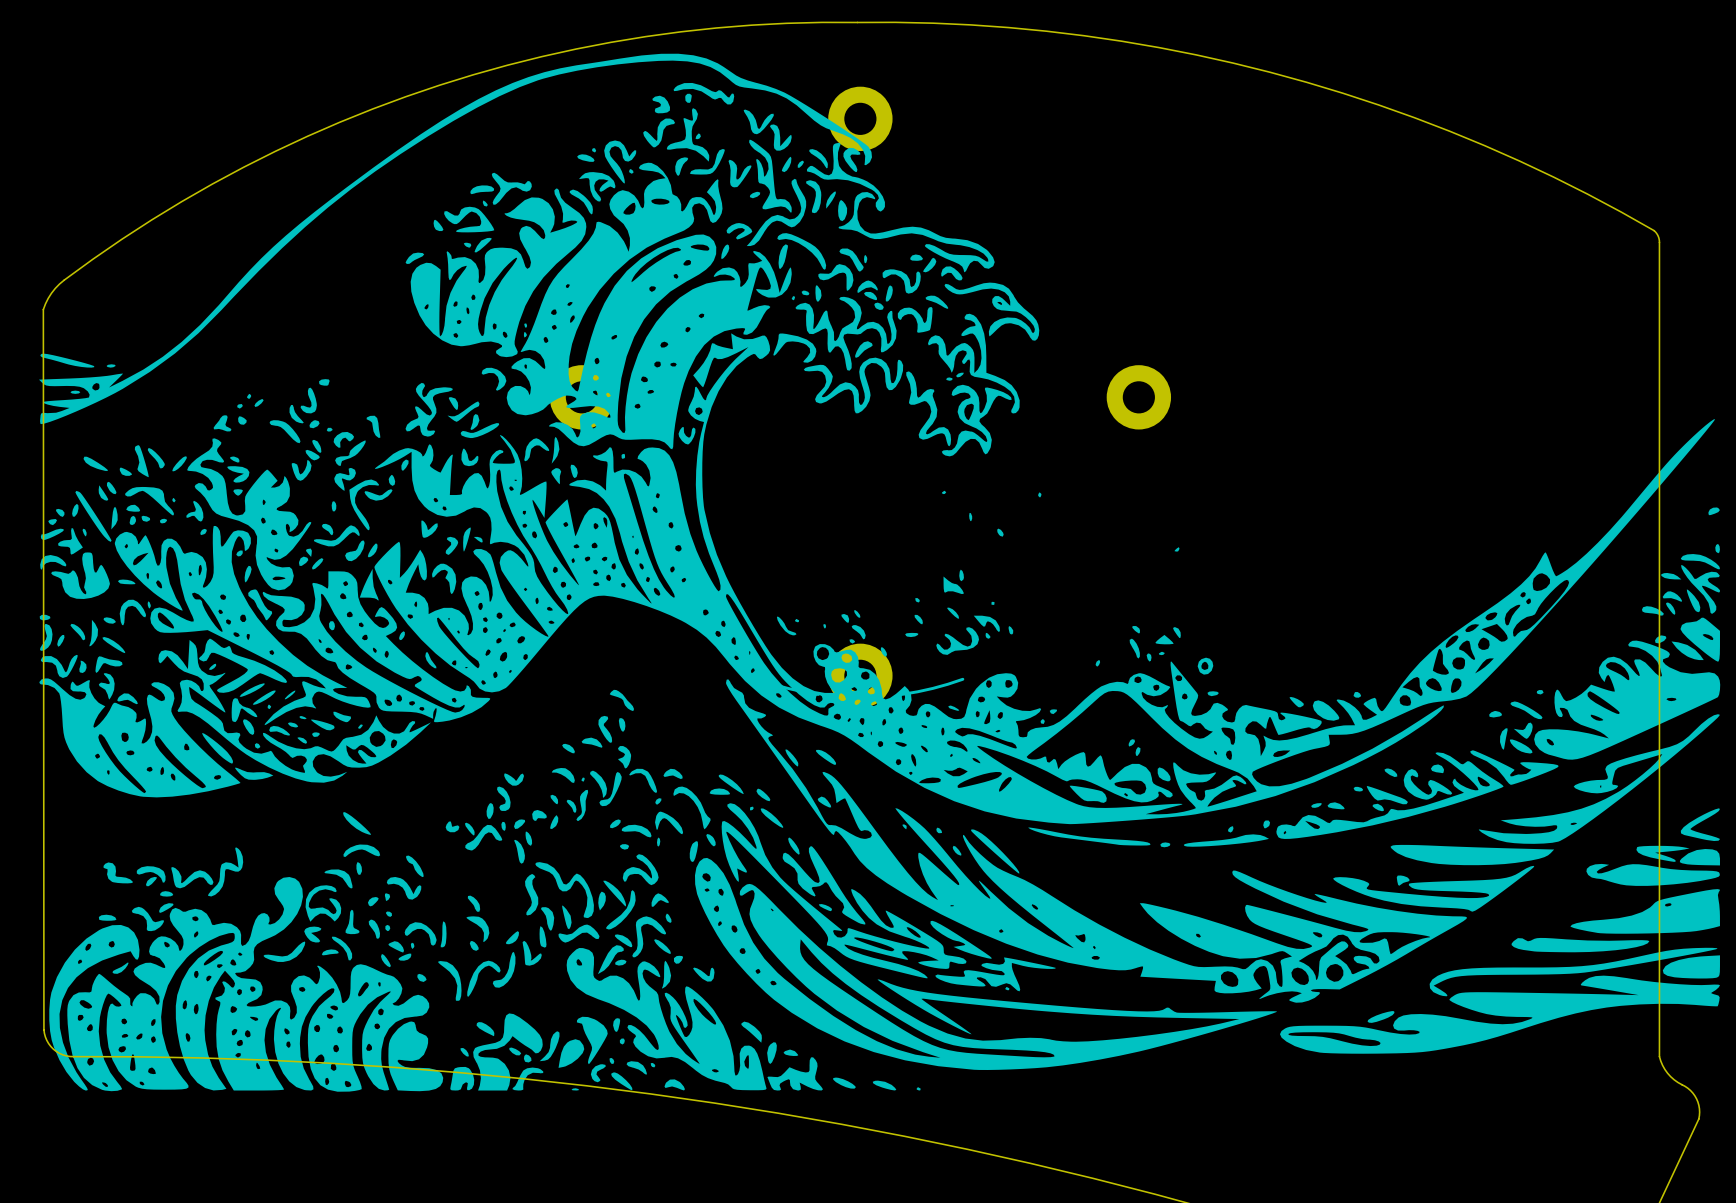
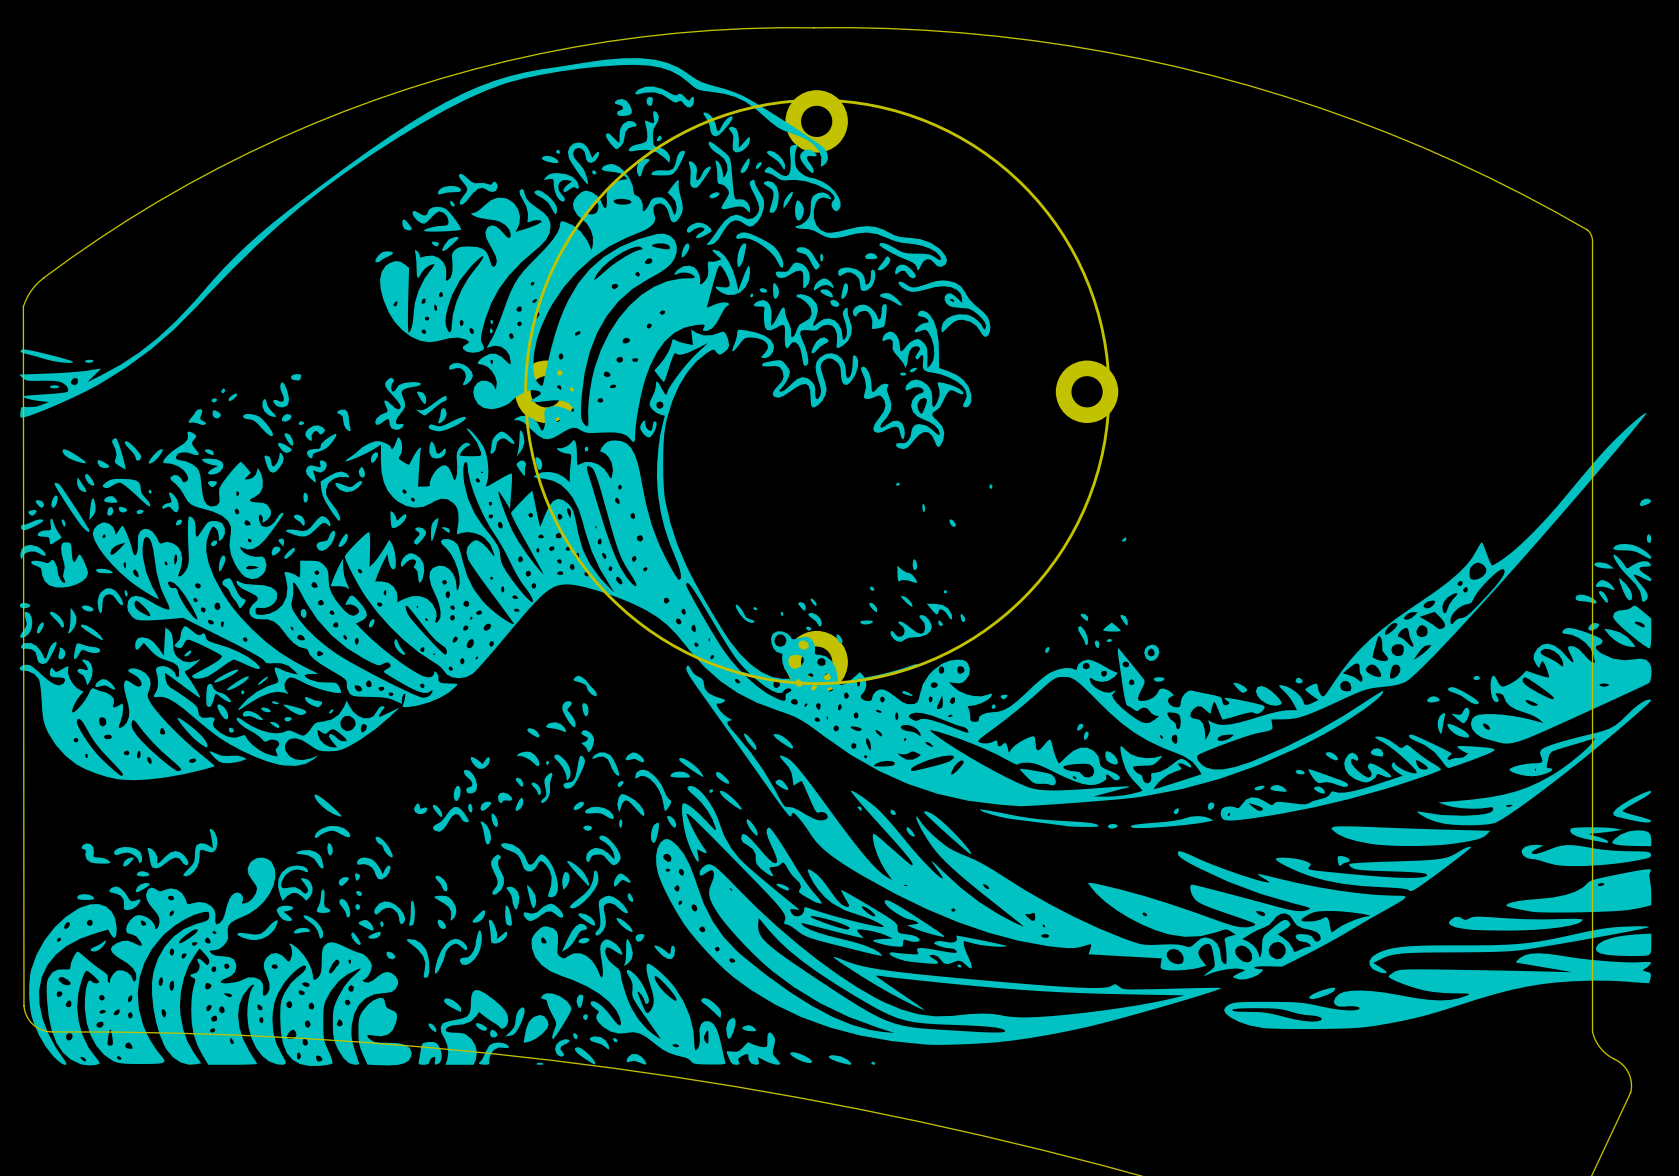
round board edge: none -> [524, 98, 1111, 686]

